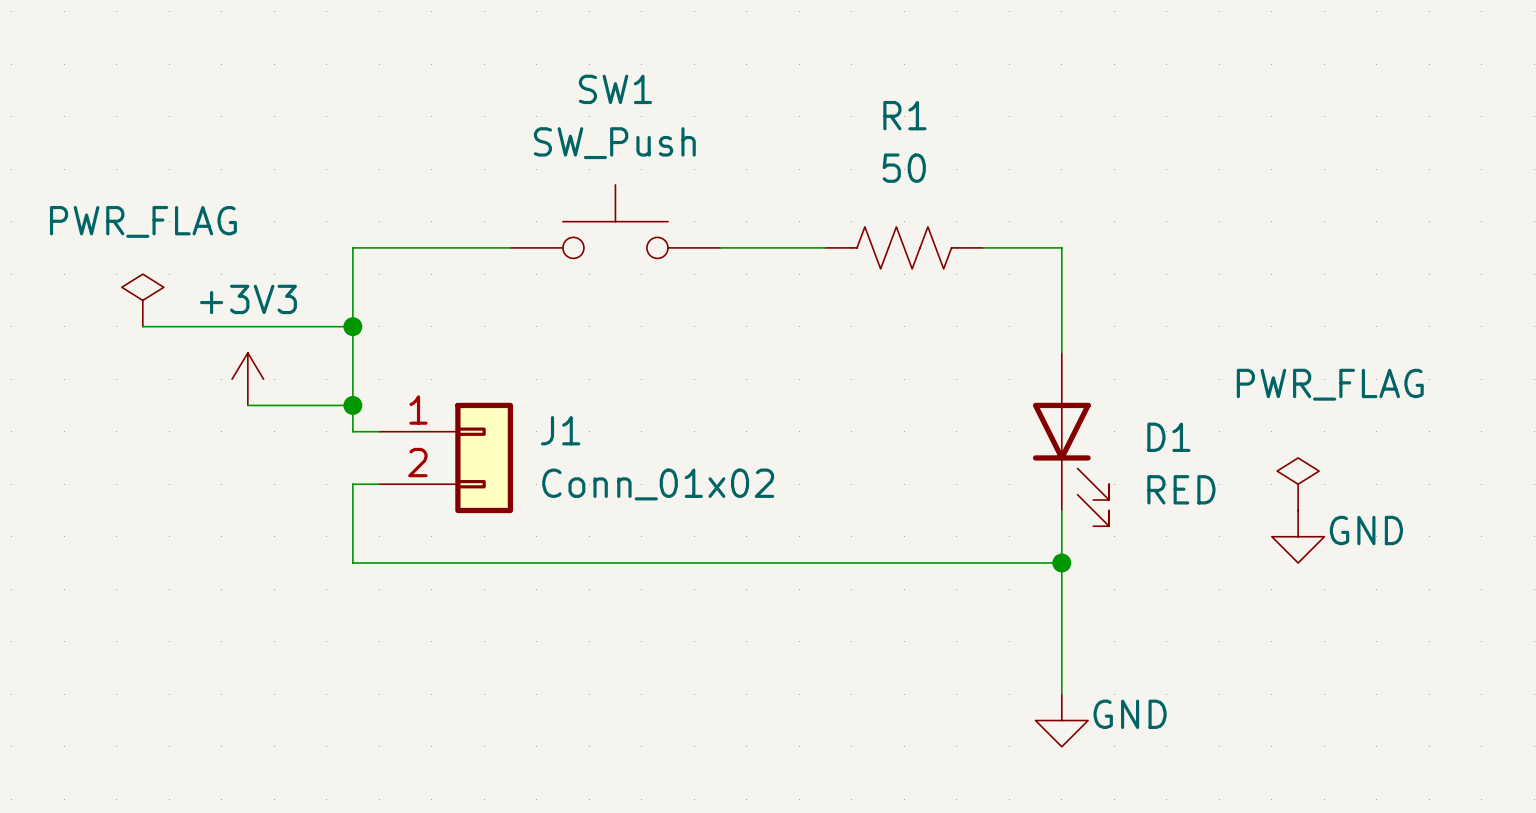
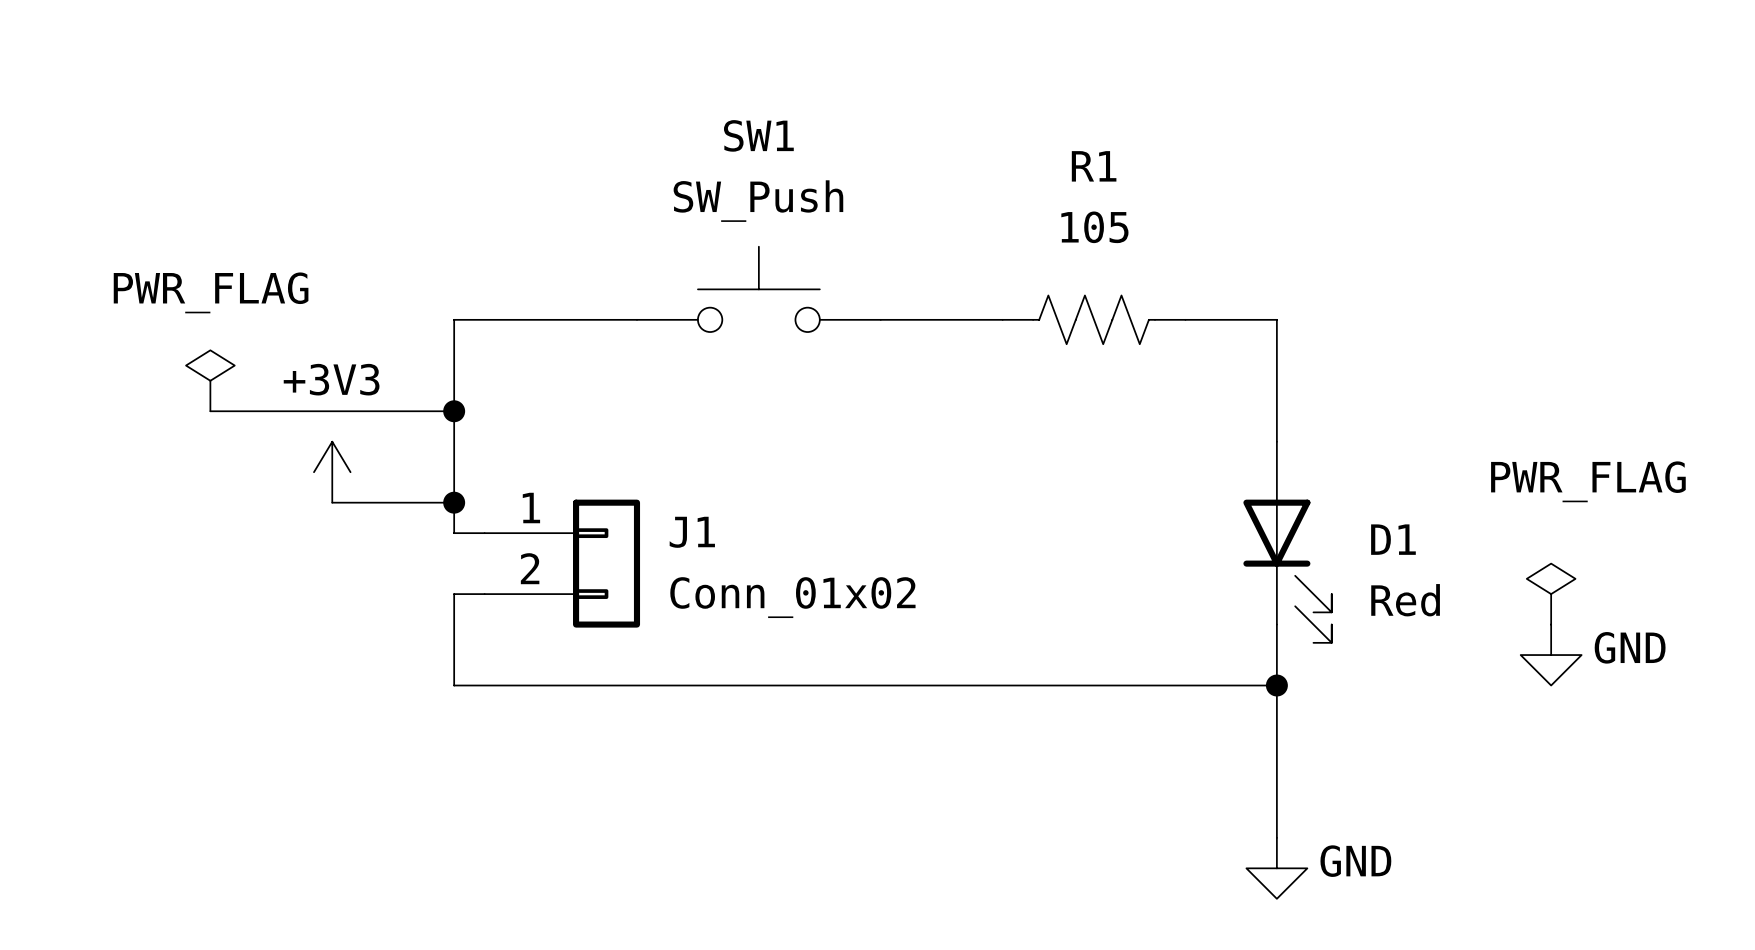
R1 value: 50 (904, 168) -> 105 (1094, 227)
D1 value: RED (1181, 489) -> Red (1405, 600)

